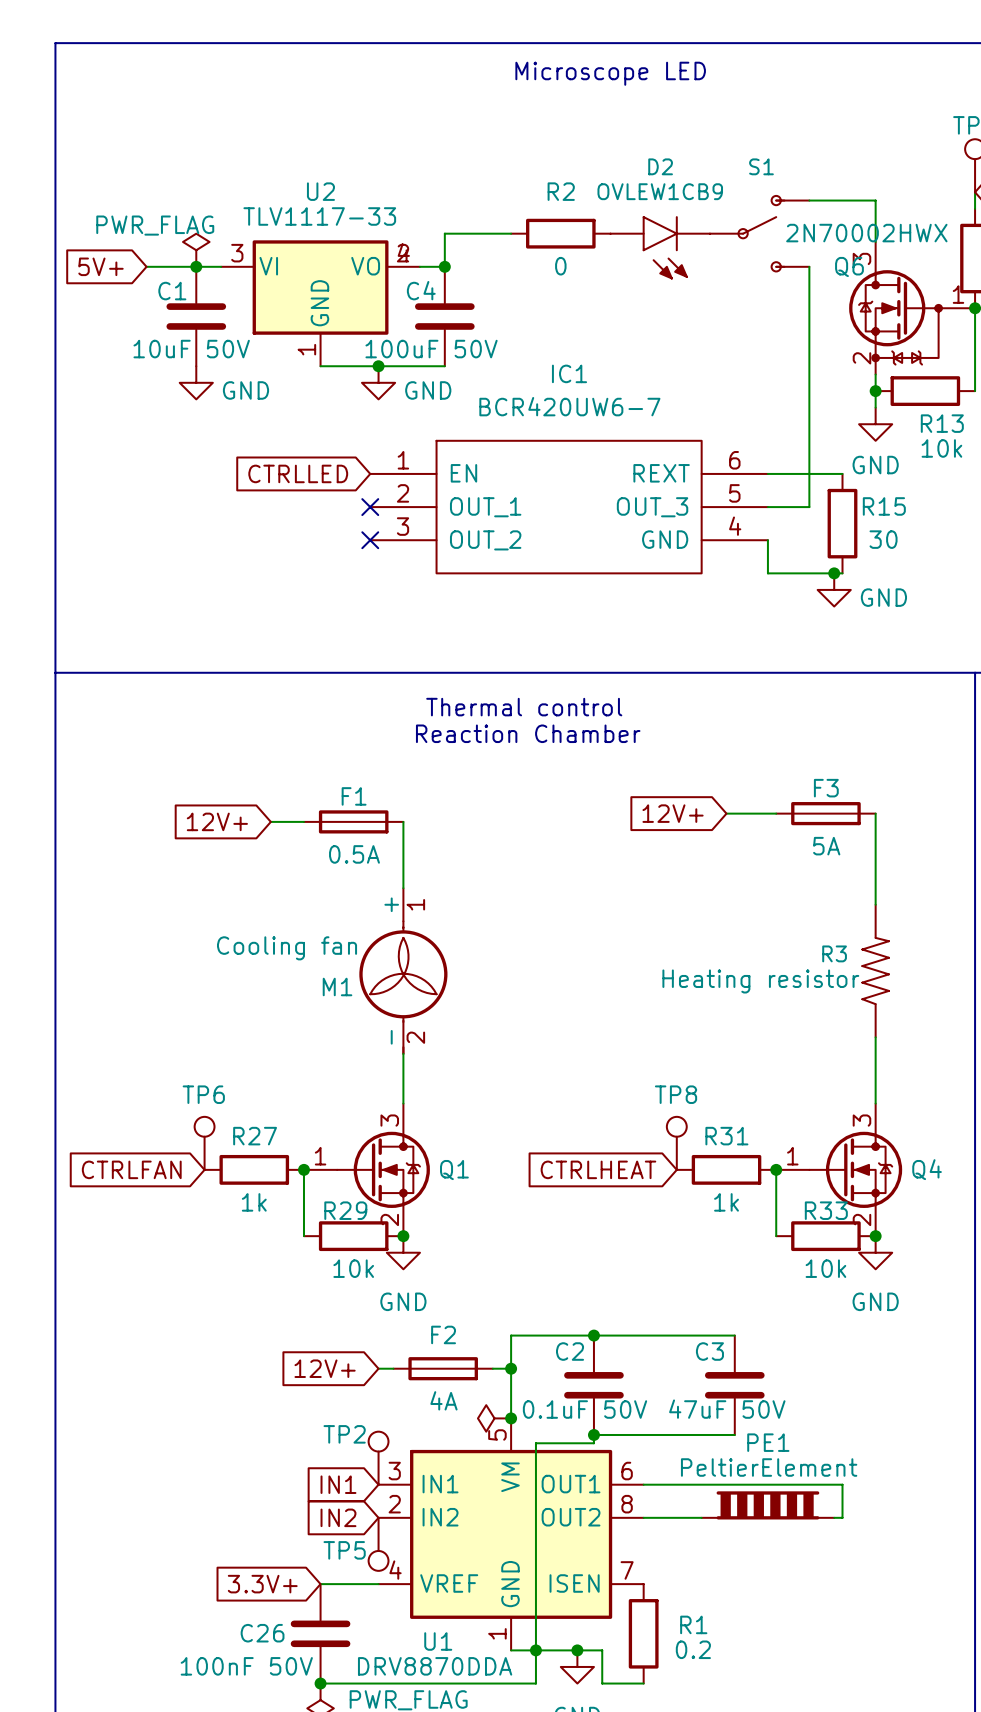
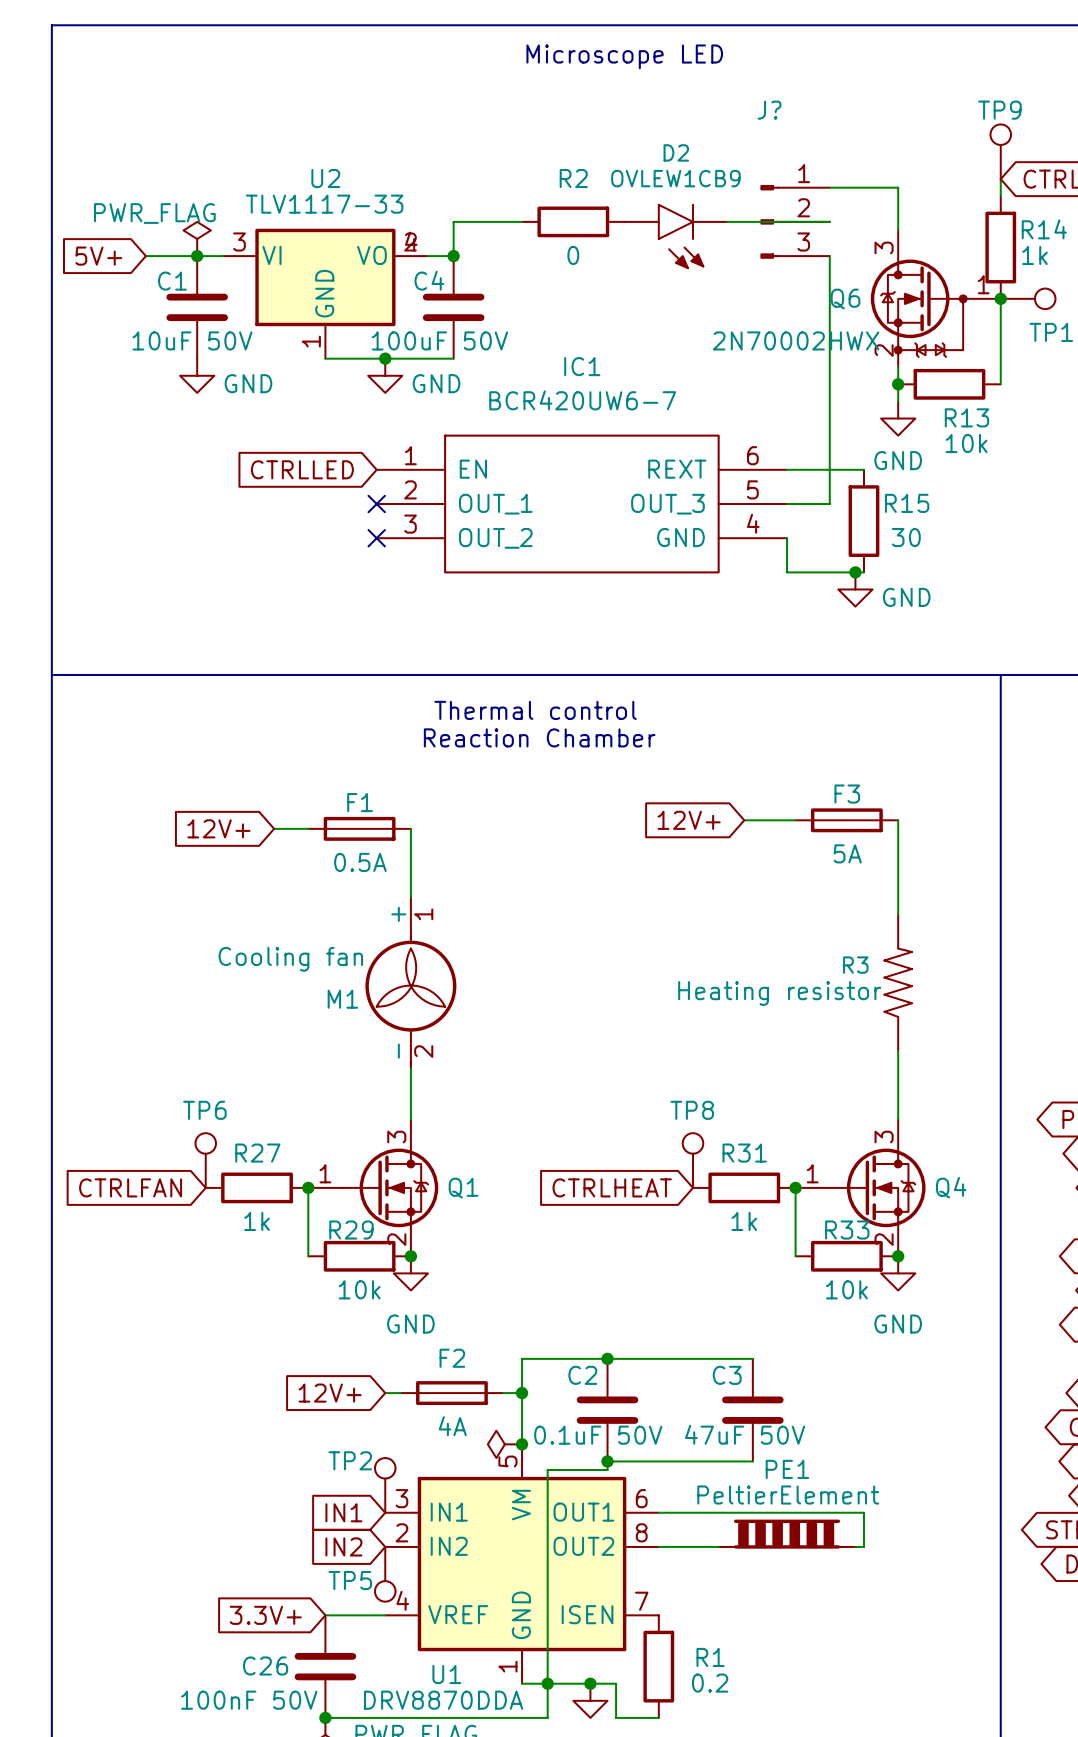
wire: none -> (727, 221) (829, 221)
S1: (759, 233) -> none
J?: none -> (795, 221)
Q6 value position: 2N70002HWX (866, 233) -> 2N70002HWX (796, 340)
Q6 name position: Q6 (849, 266) -> Q6 (845, 299)

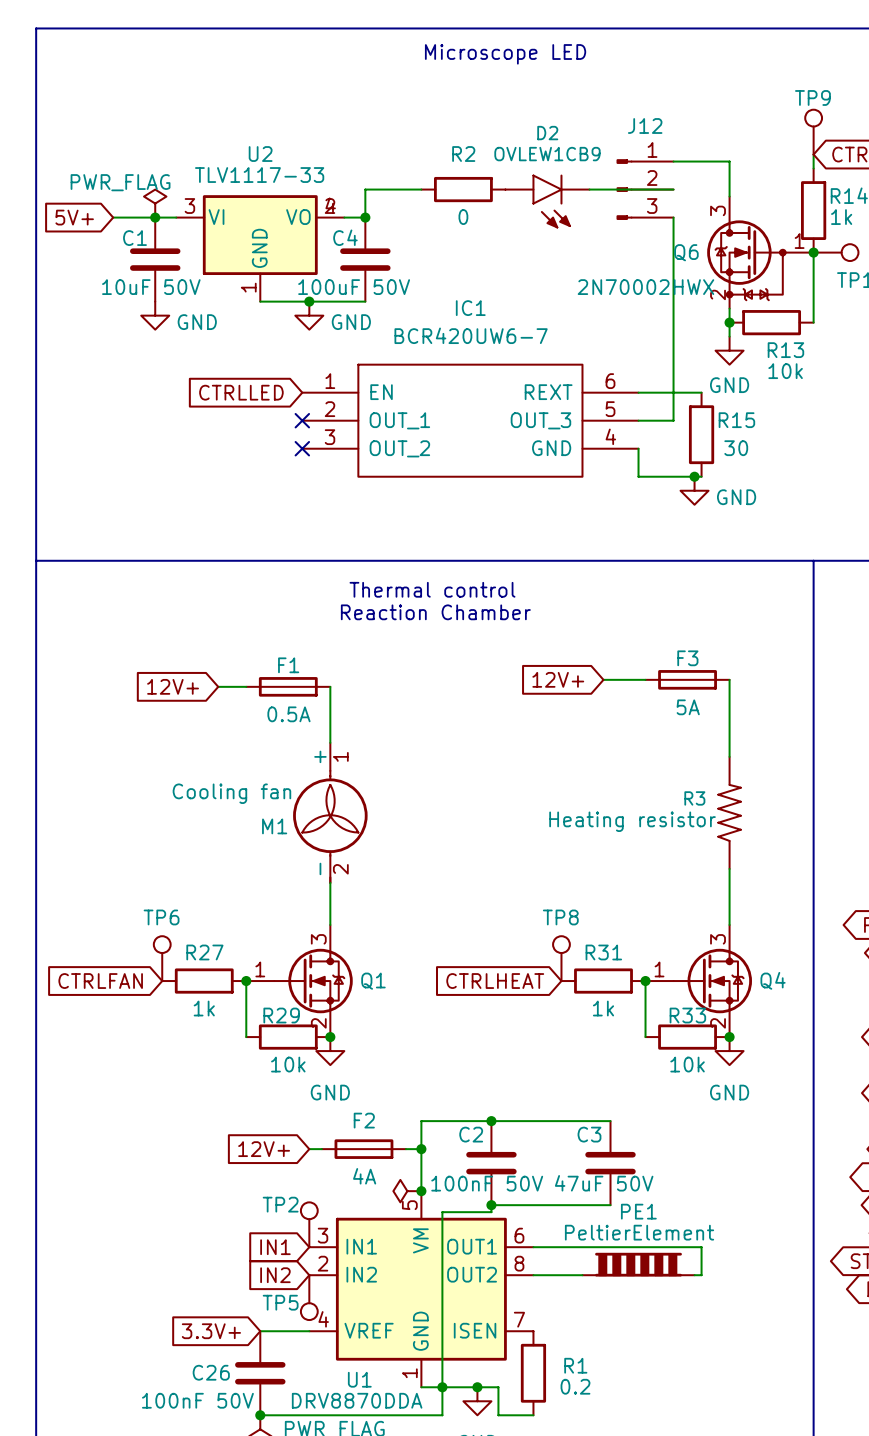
J? name: J? (769, 110) -> J12 (645, 126)
C2 value: 0.1uF 50V (598, 1435) -> 100nF 50V (487, 1183)

